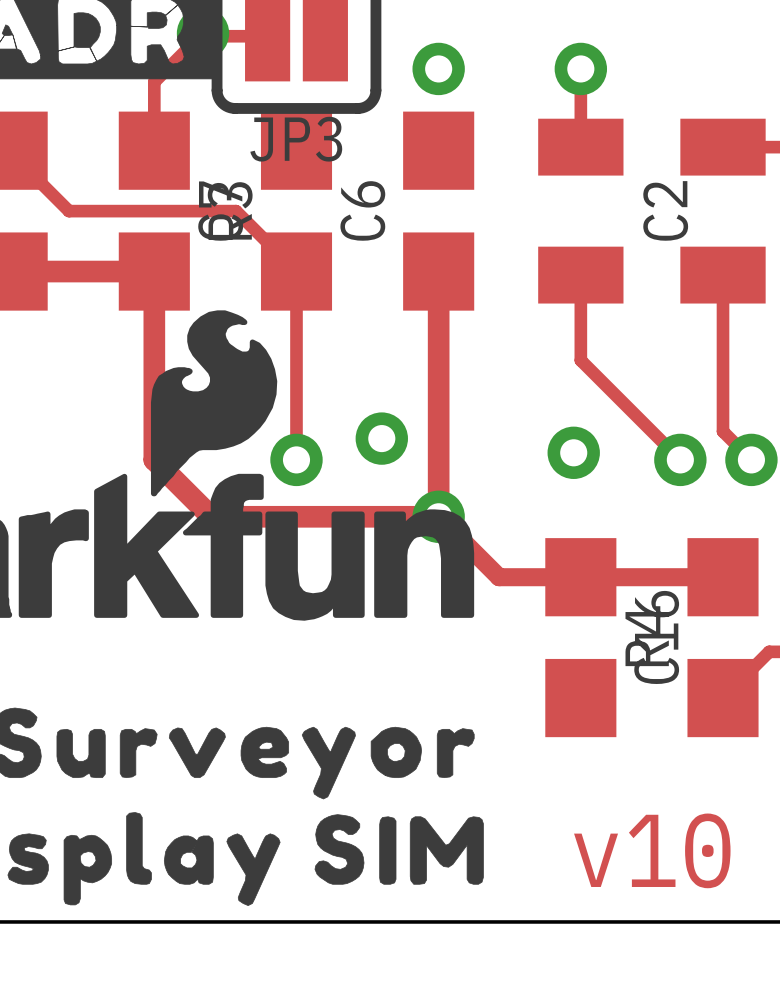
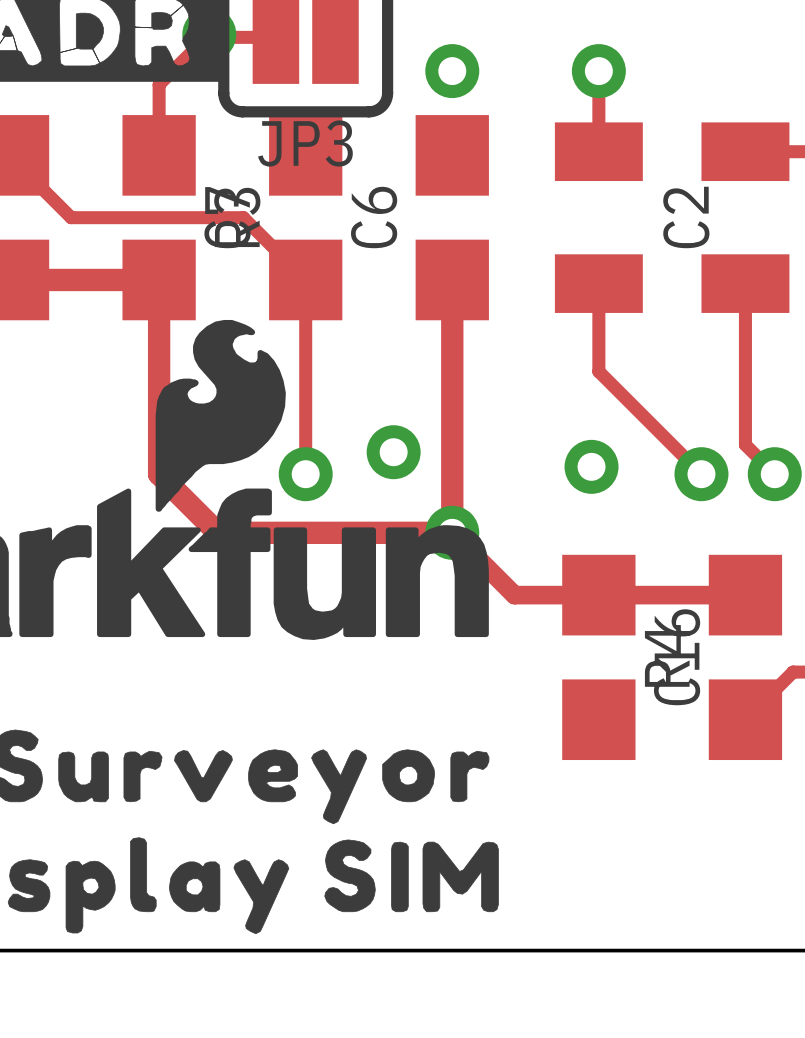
text: v10 (652, 850) -> none

